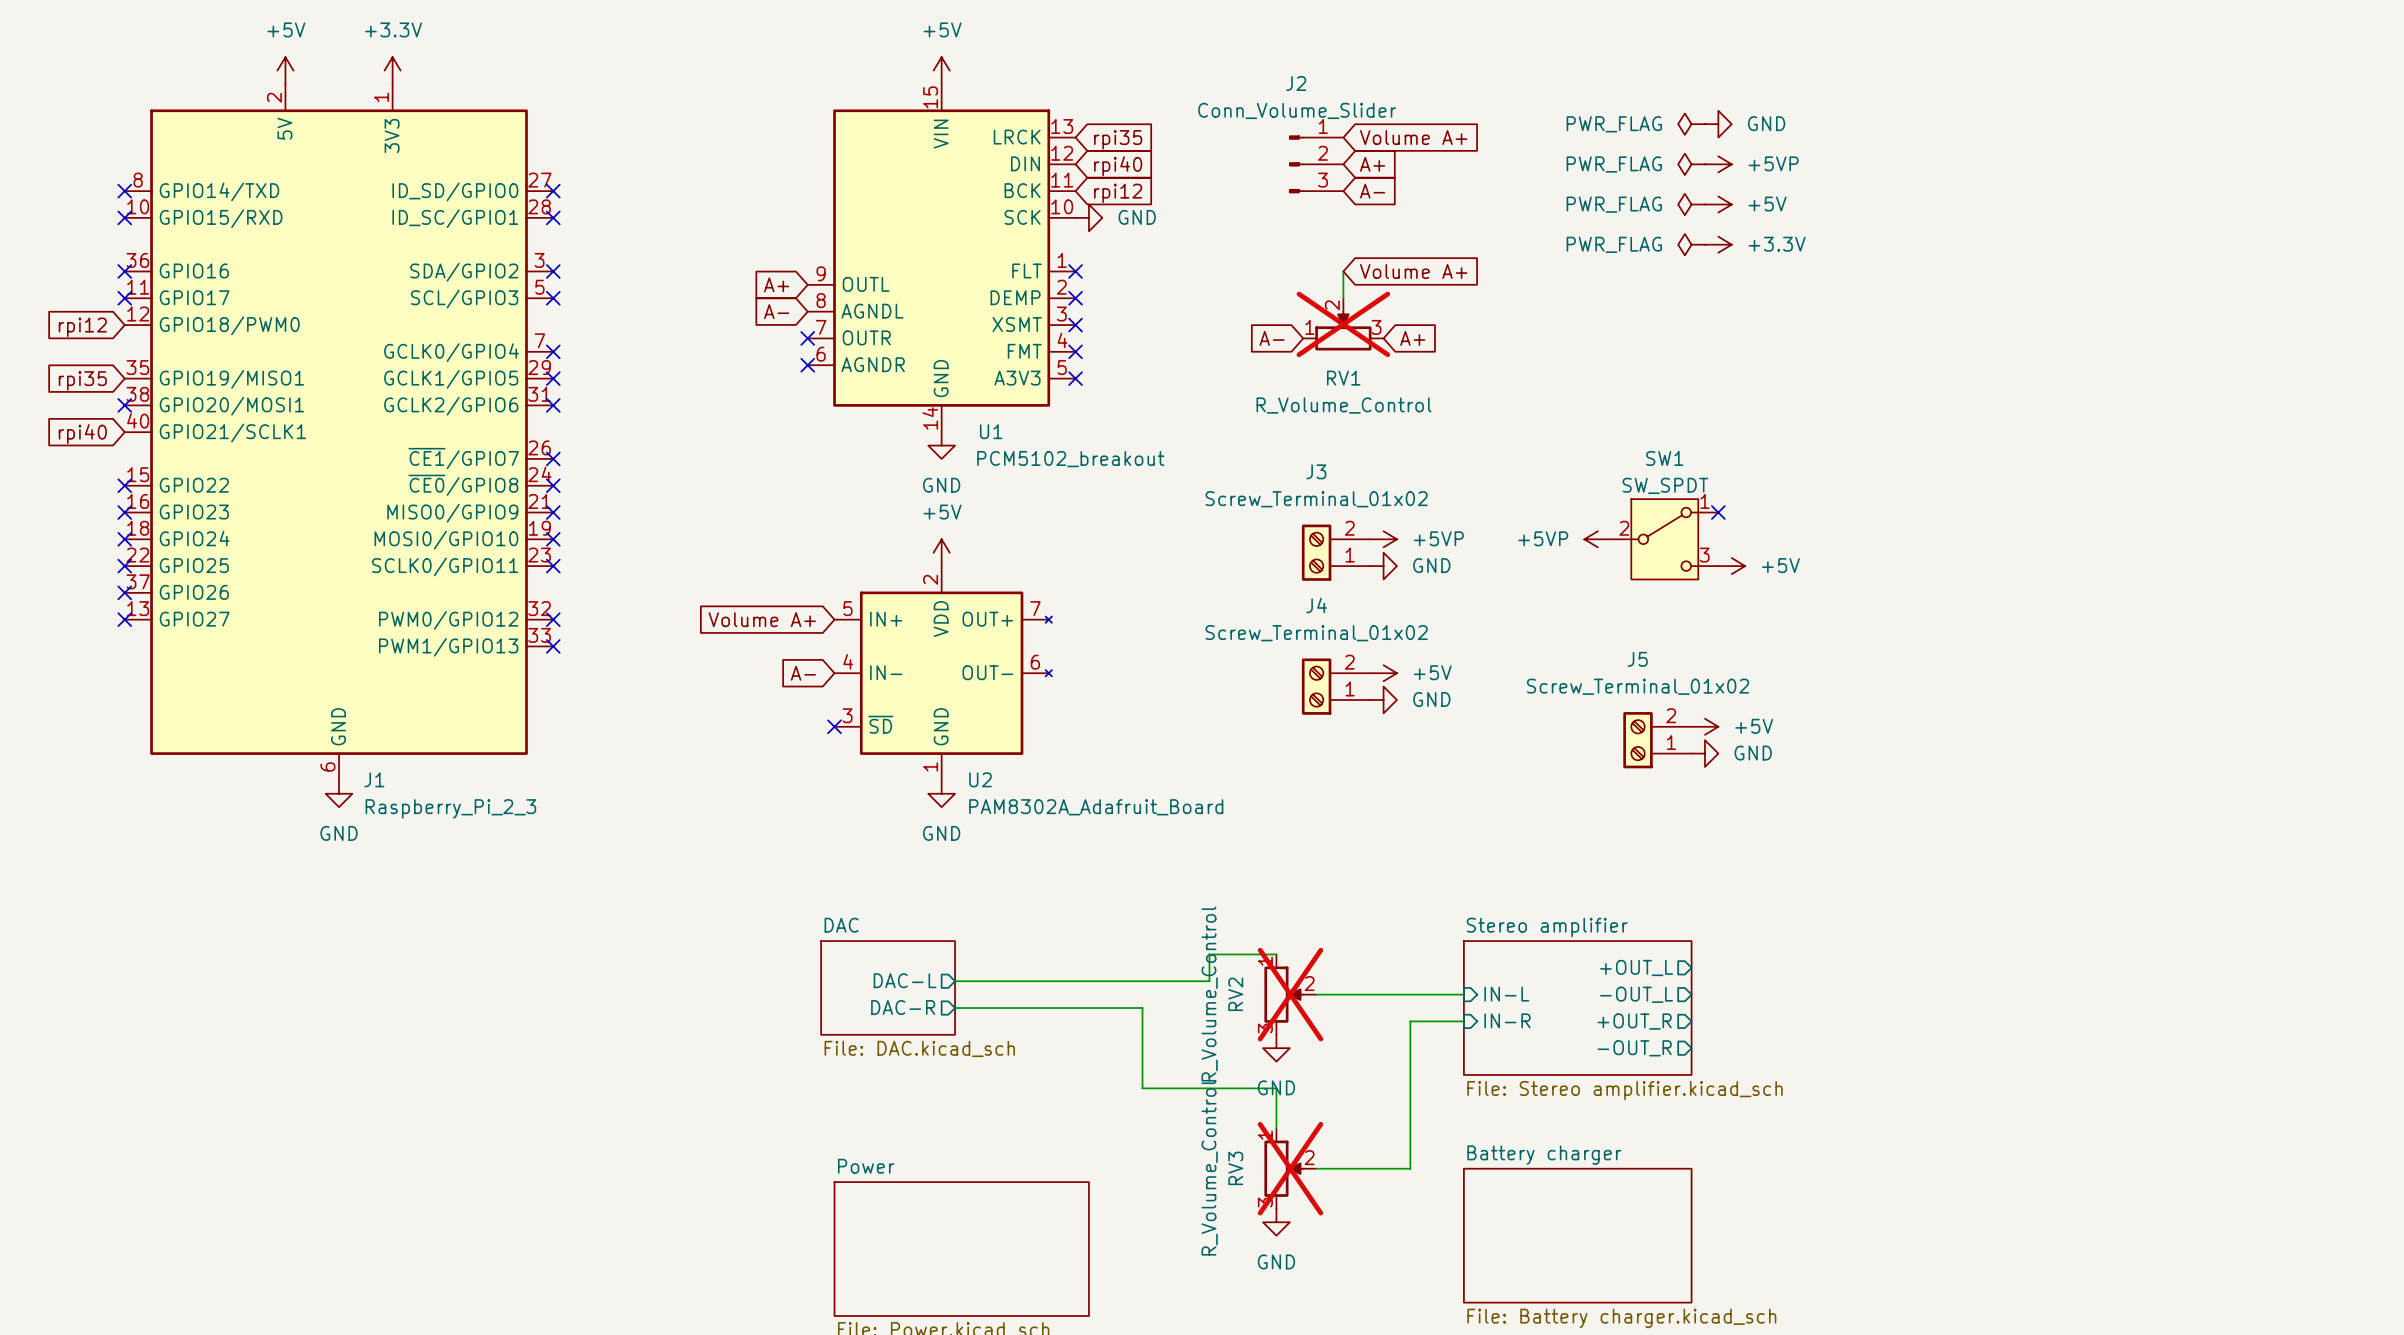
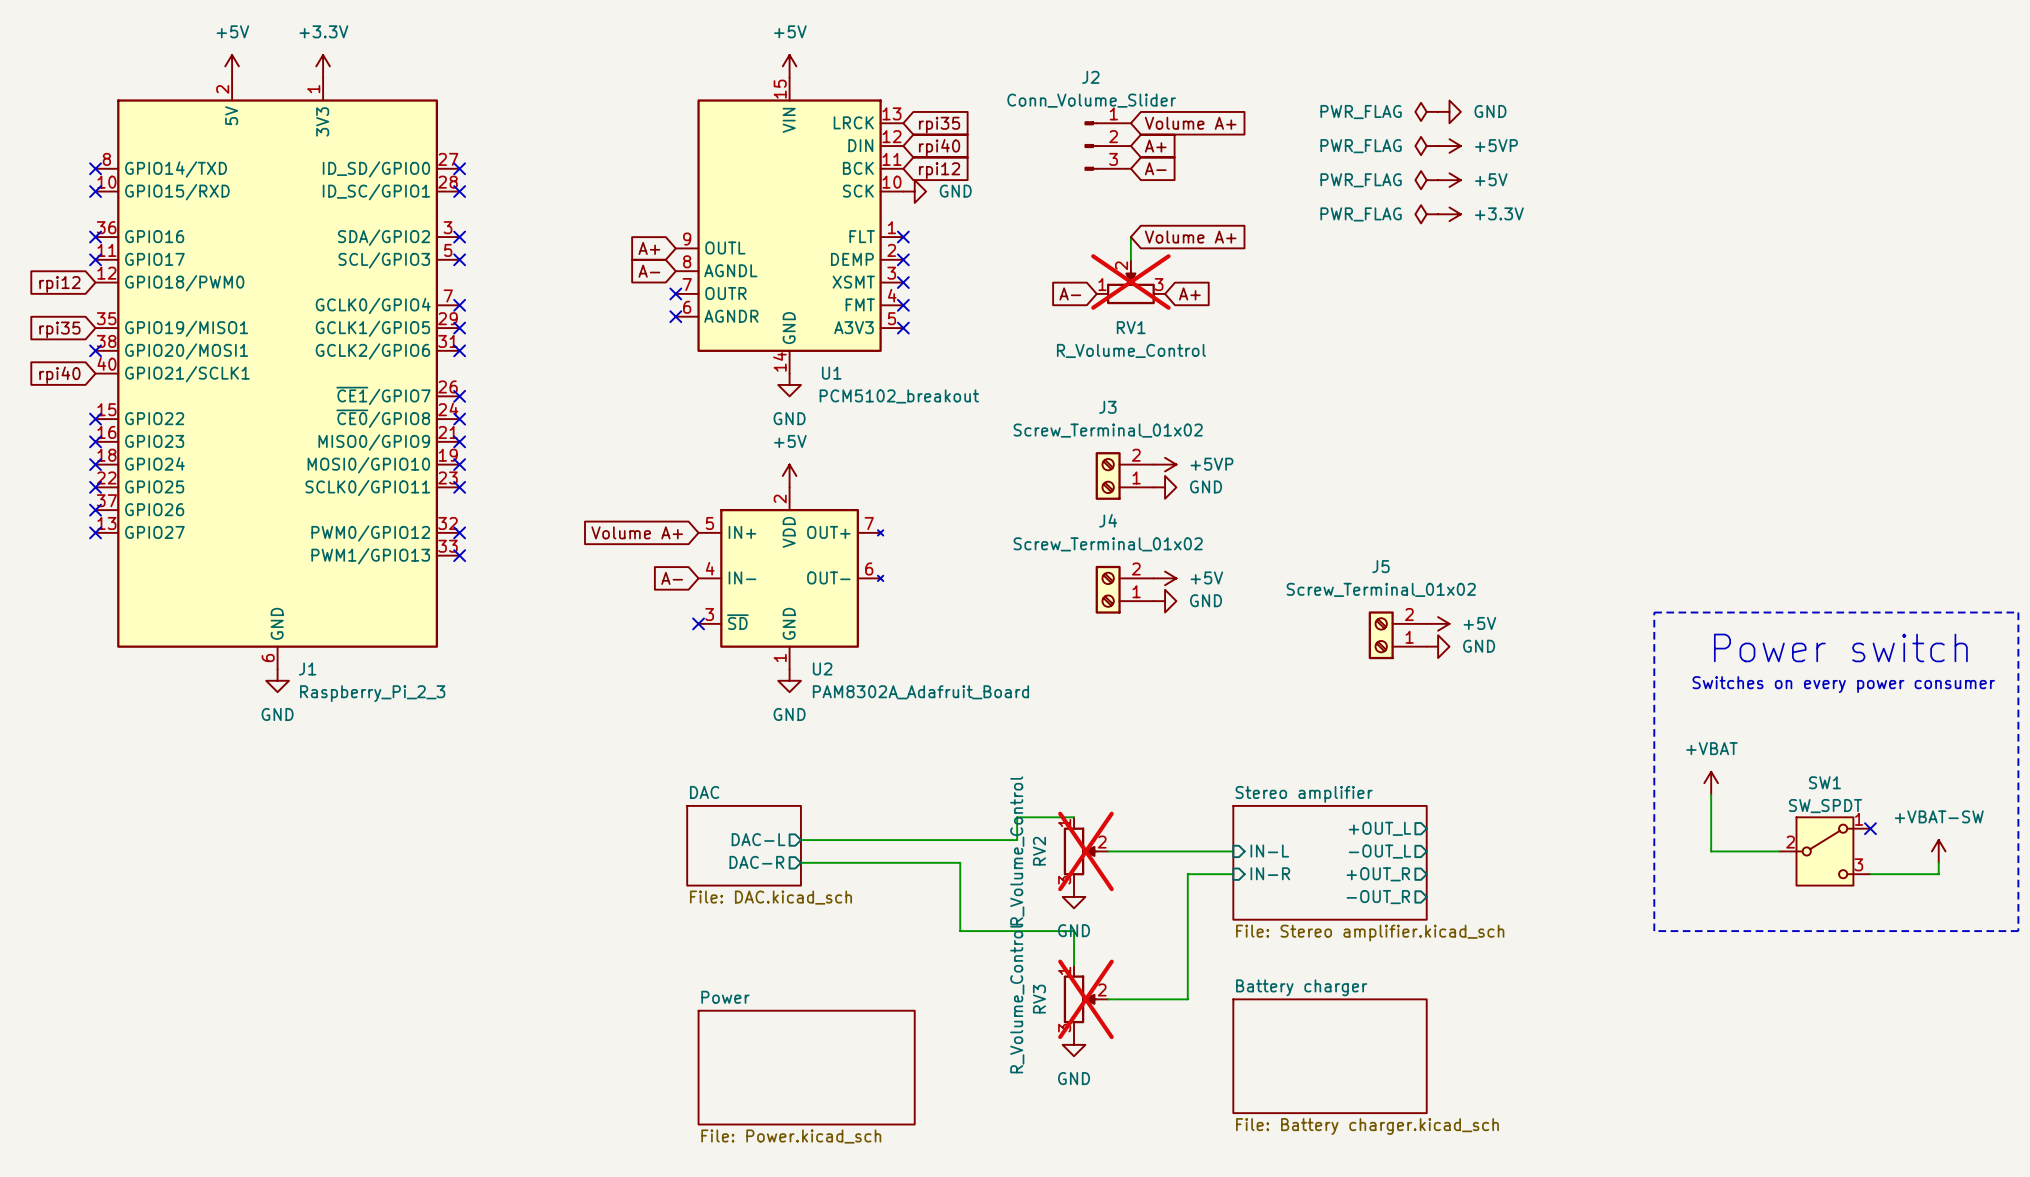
no-connect mark: (1718, 512) -> none
power symbol: +5VP (1597, 539) -> none
SW1 position: (1664, 539) -> (1824, 851)
power symbol: +5V (1731, 566) -> none
line: none -> (1654, 612) (2018, 612) (2018, 931) (1654, 931) (1654, 612)
text: none -> Power switch (1840, 647)
text: none -> Switches on every power consumer (1843, 684)
power symbol: none -> +VBAT (1711, 783)
wire: none -> (1711, 794) (1711, 851) (1779, 851)
no-connect mark: none -> (1870, 828)
power symbol: none -> +VBAT-SW (1938, 851)
wire: none -> (1938, 862) (1938, 874) (1870, 874)

